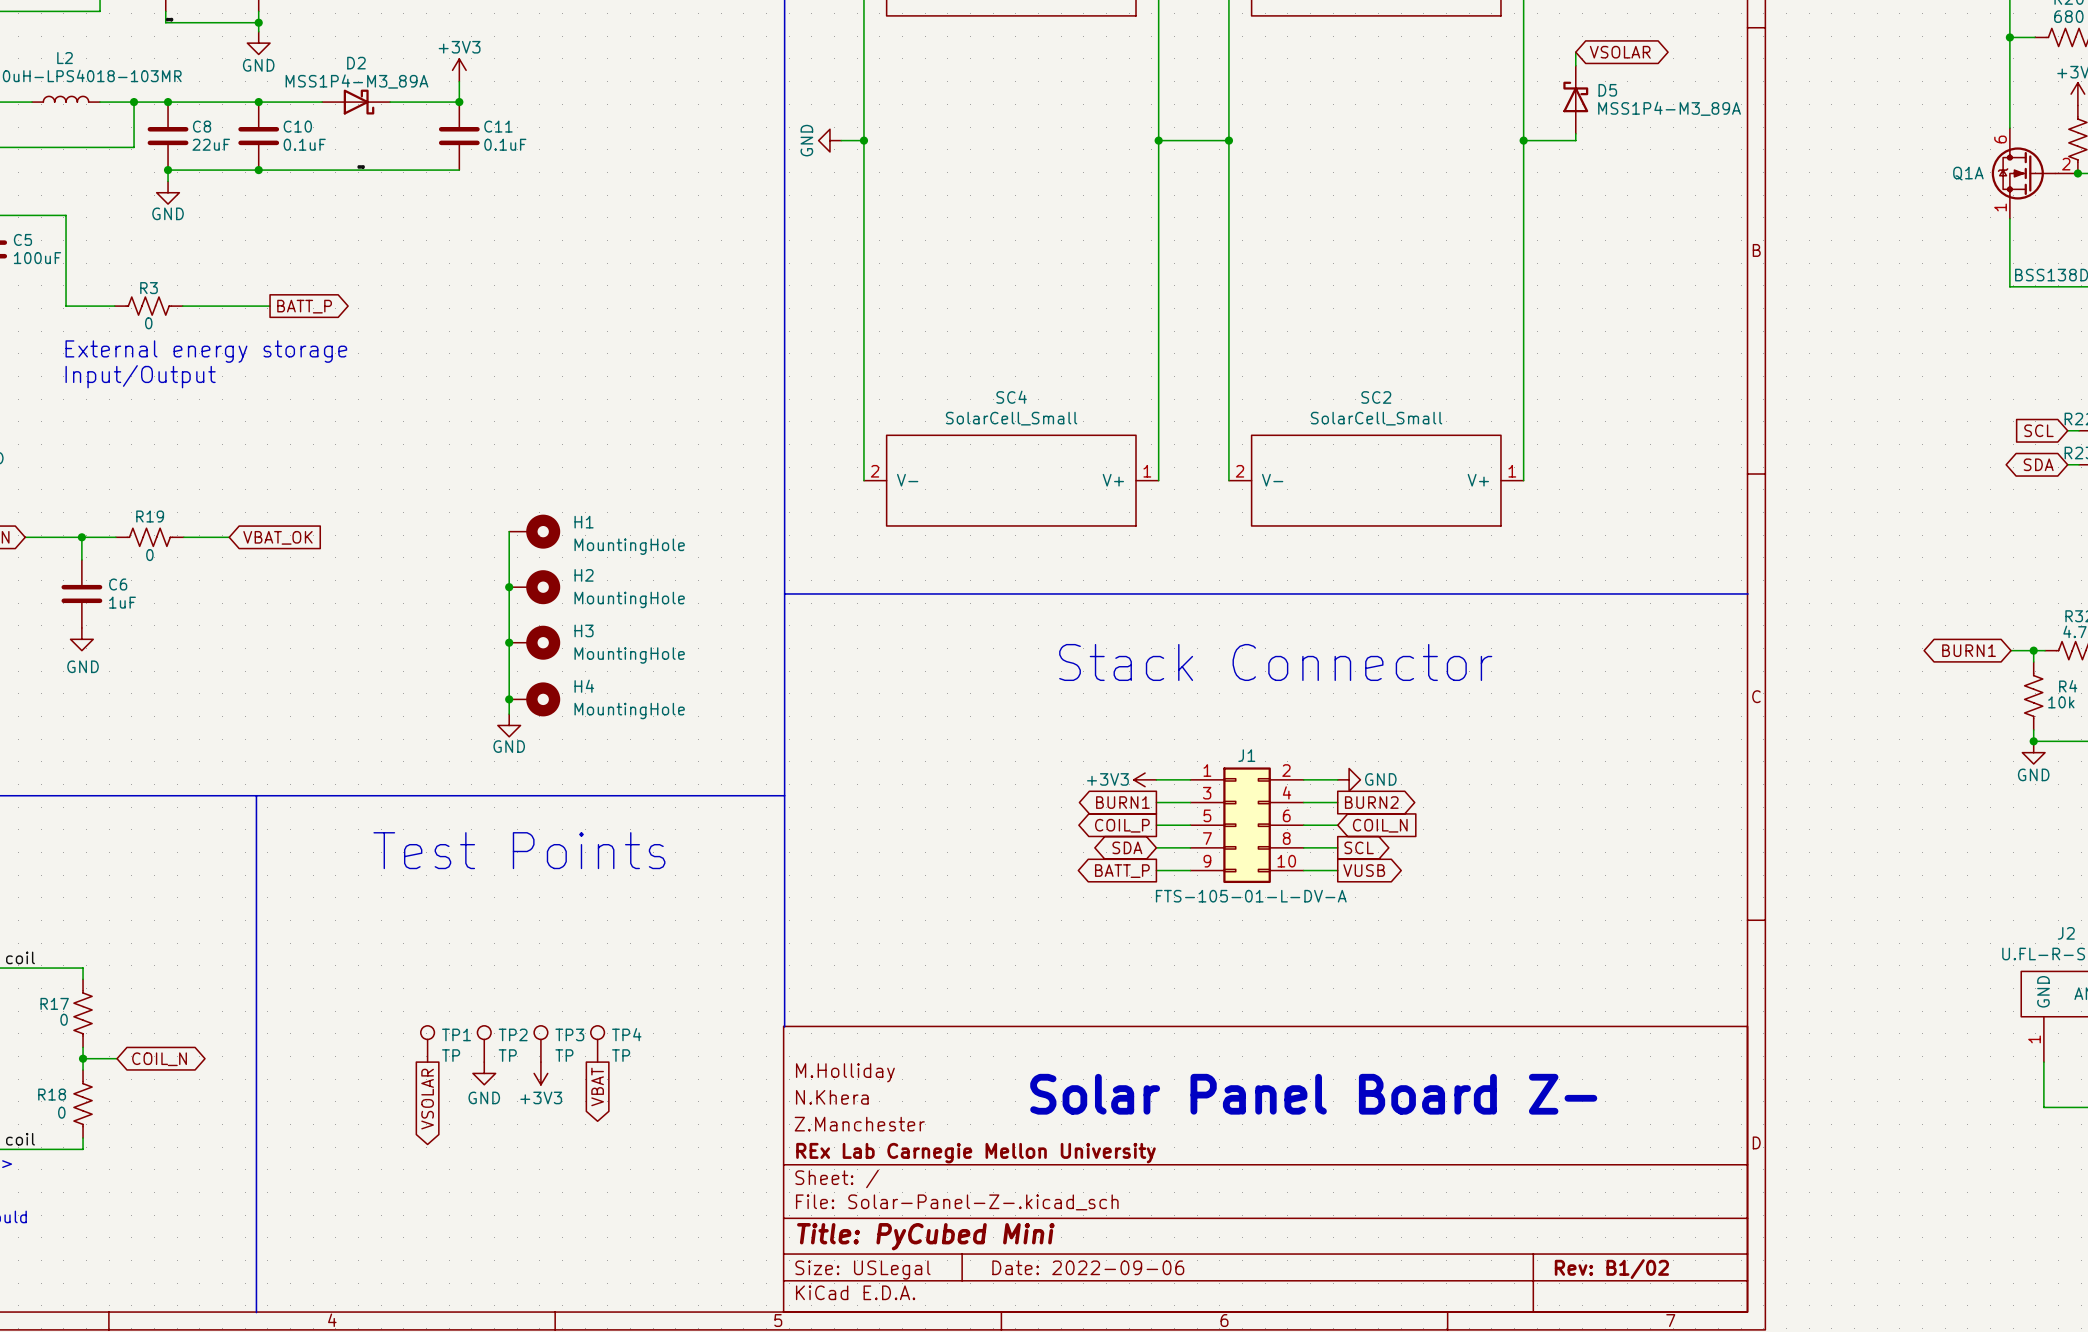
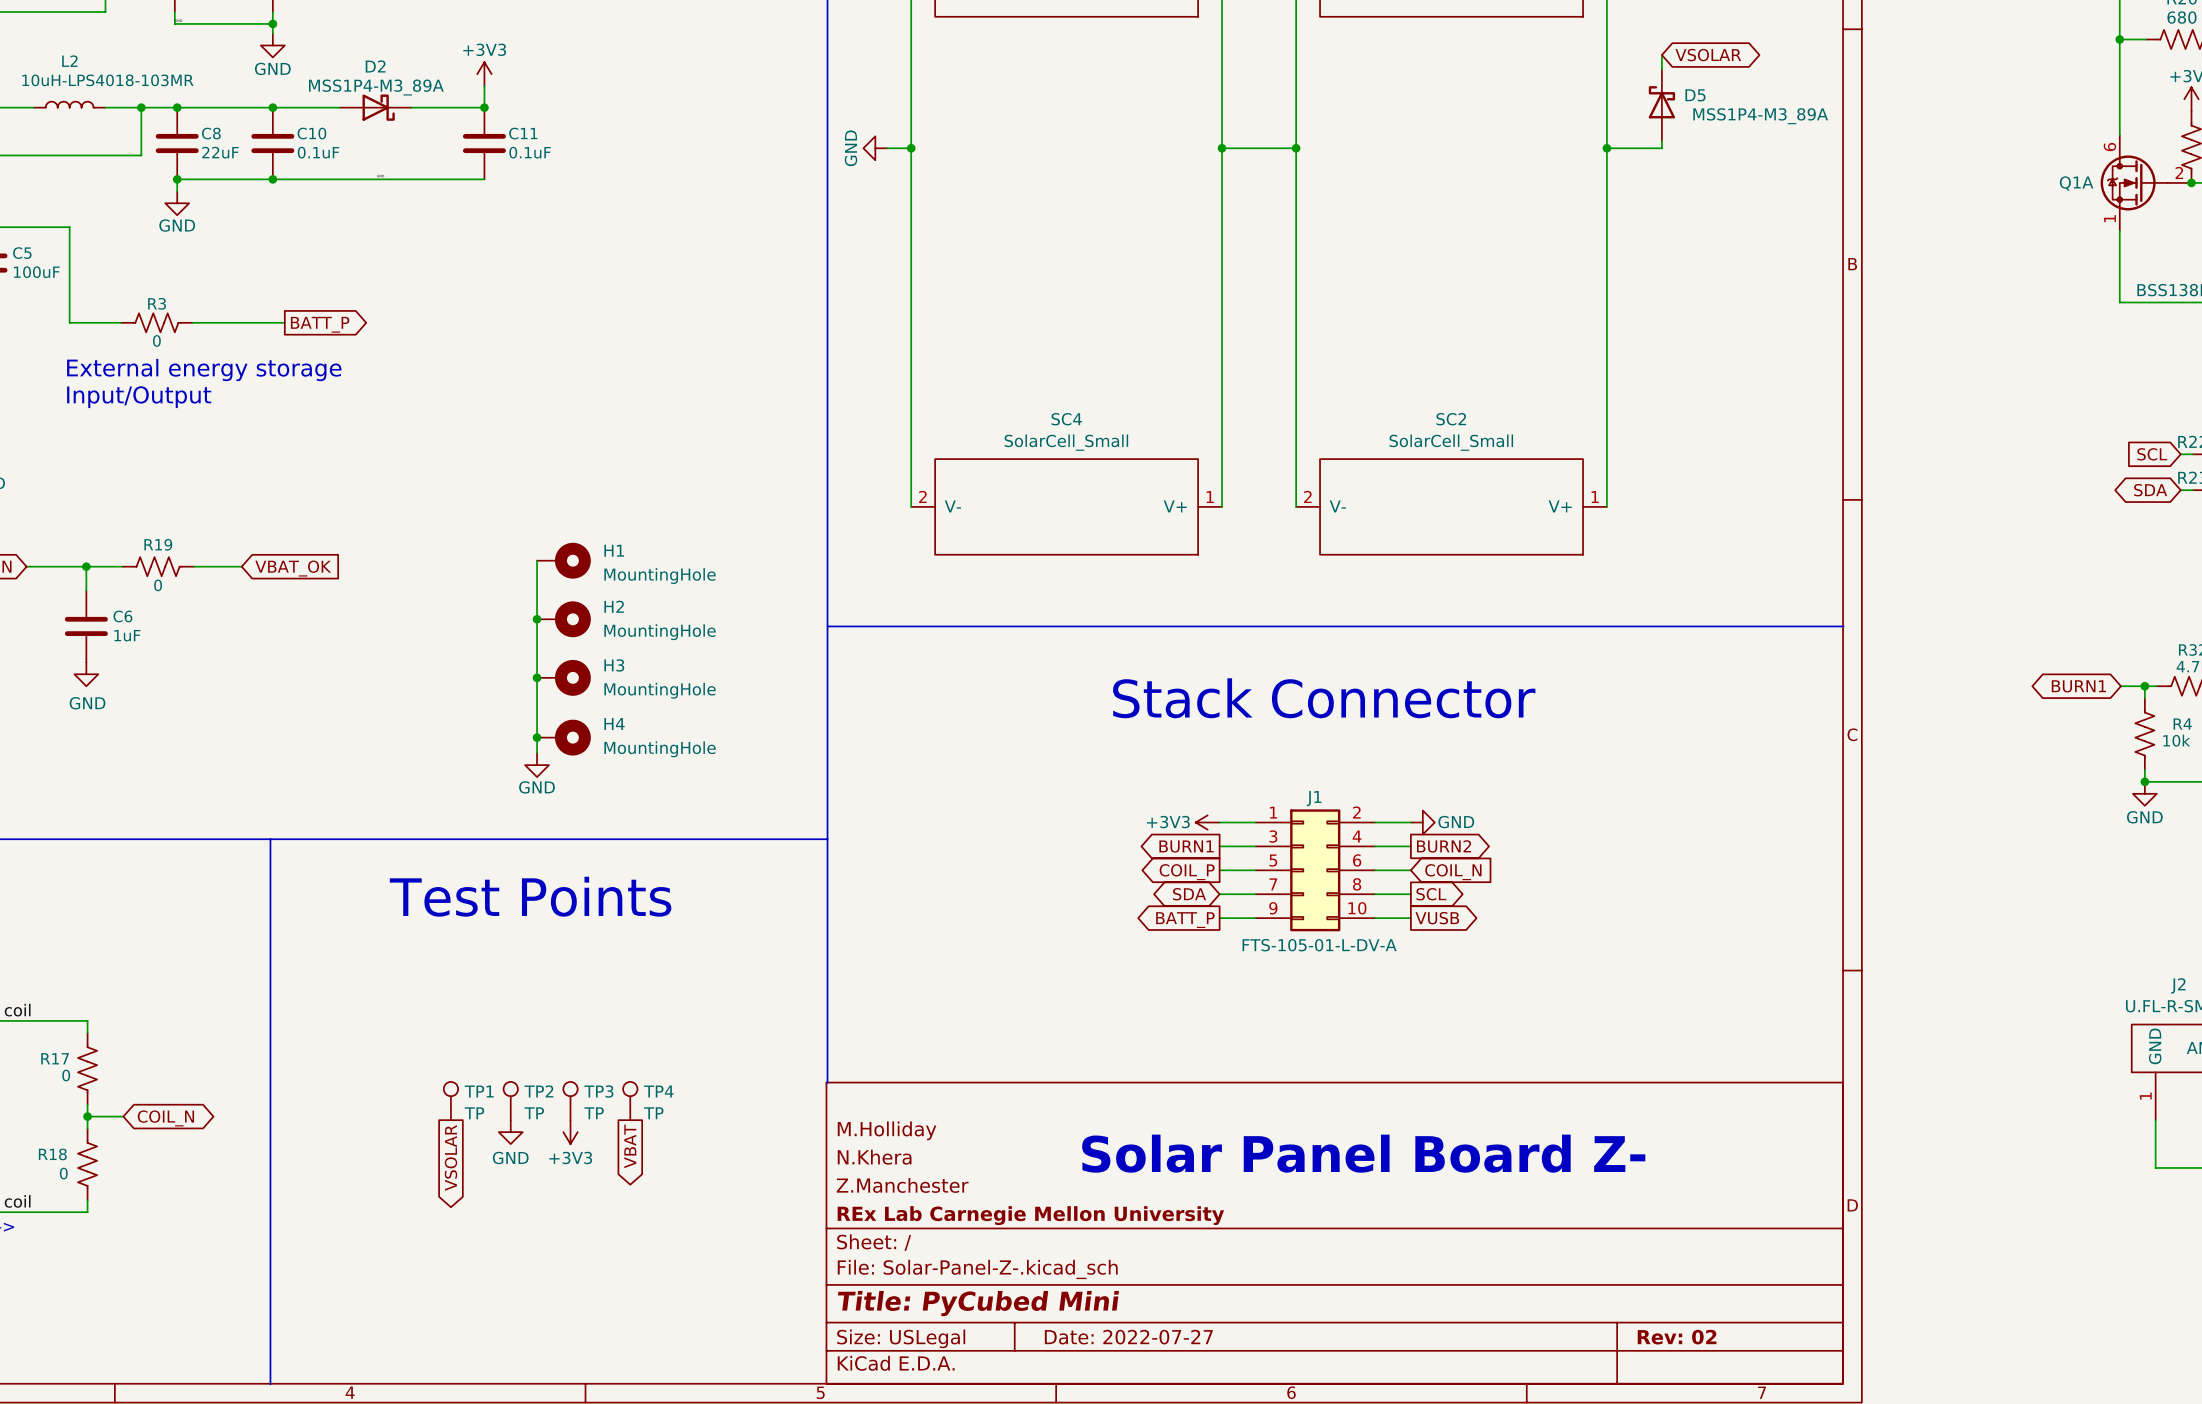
title block: Date: 2022-09-06 (1088, 1267) -> Date: 2022-07-27 (1128, 1337)
title block: Rev: B1/02 (1611, 1269) -> Rev: 02 (1677, 1337)

